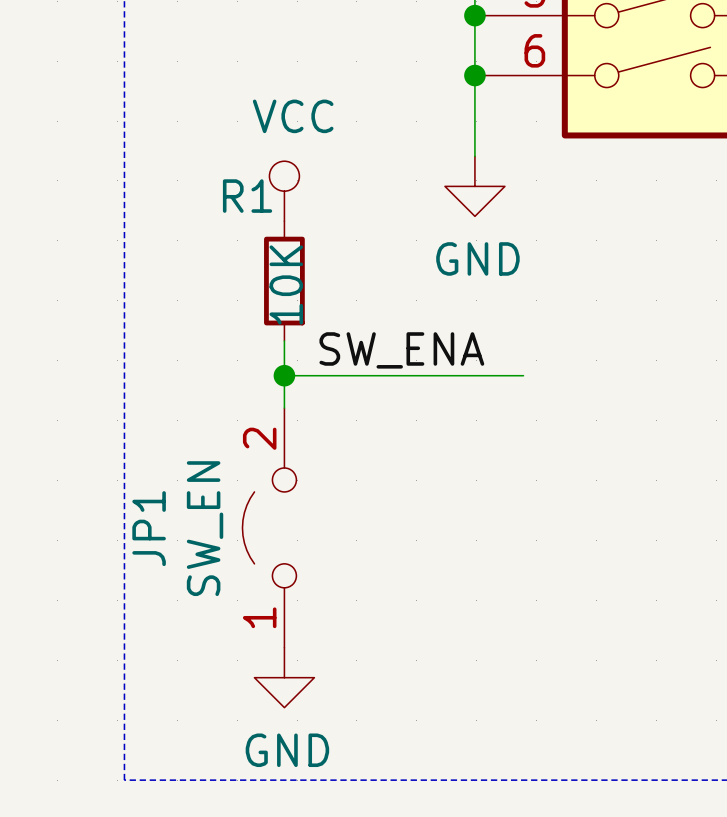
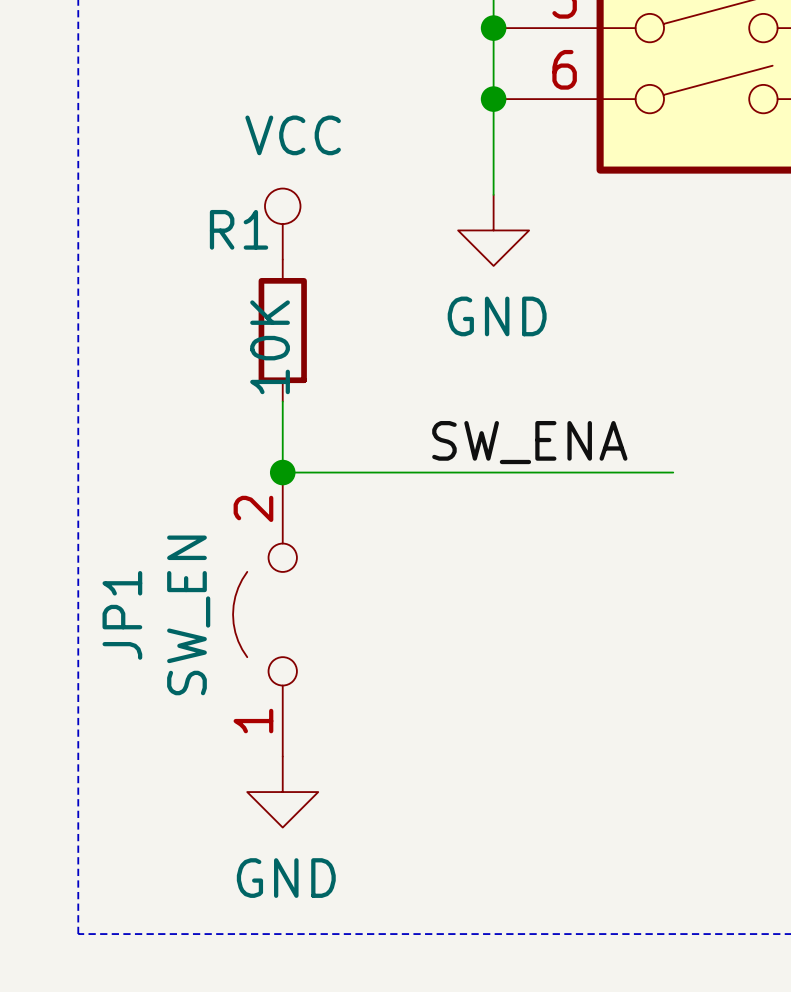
power symbol position: VCC (284, 191) -> VCC (282, 224)
R1 position: (284, 281) -> (282, 330)
wire: none -> (282, 401) (282, 472) (673, 472)
wire: (284, 340) (284, 408) -> none
label position: SW_ENA (401, 350) -> SW_ENA (529, 442)
wire: (284, 375) (523, 375) -> none
junction position: (284, 375) -> (282, 472)
JP1 position: (269, 527) -> (264, 614)
power symbol position: GND (284, 677) -> GND (282, 792)

